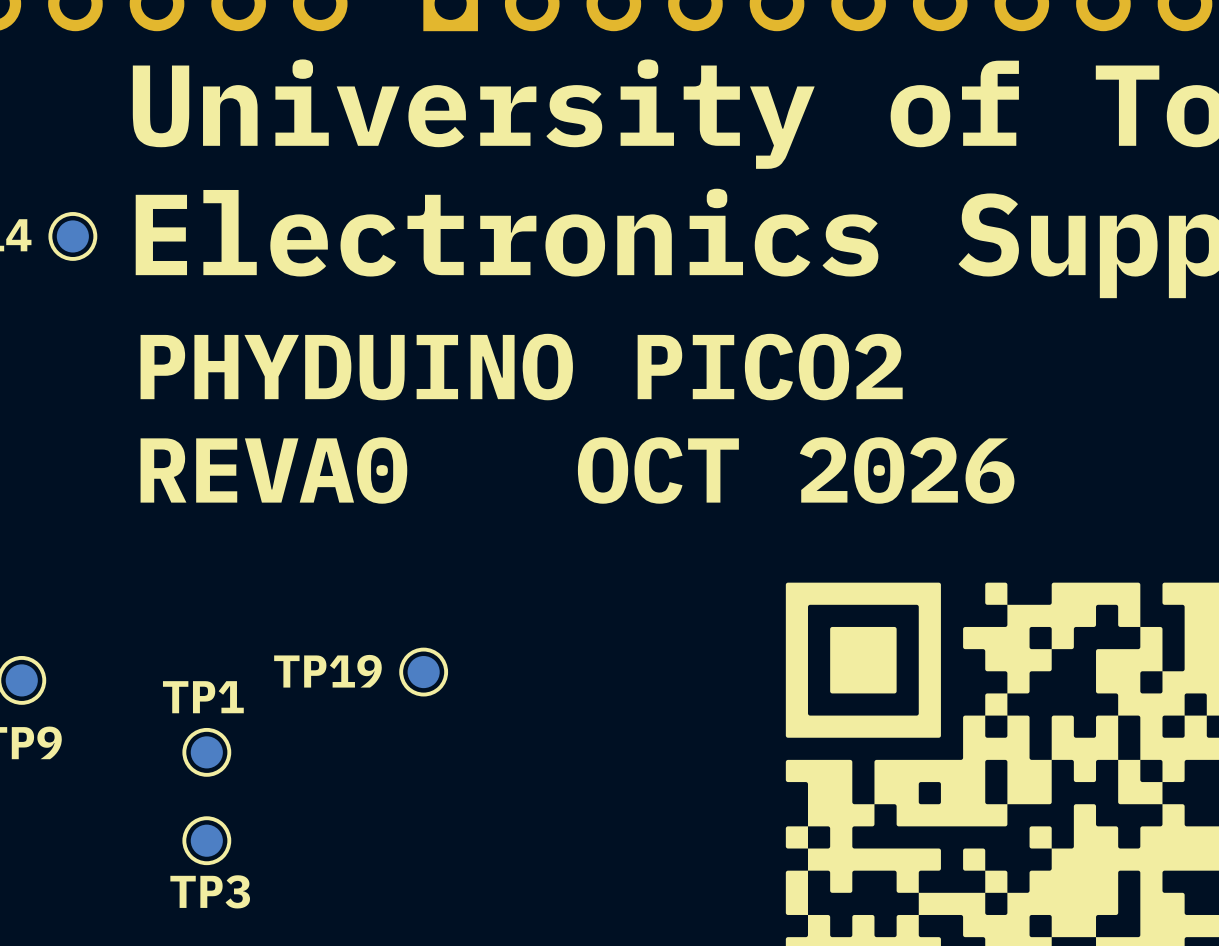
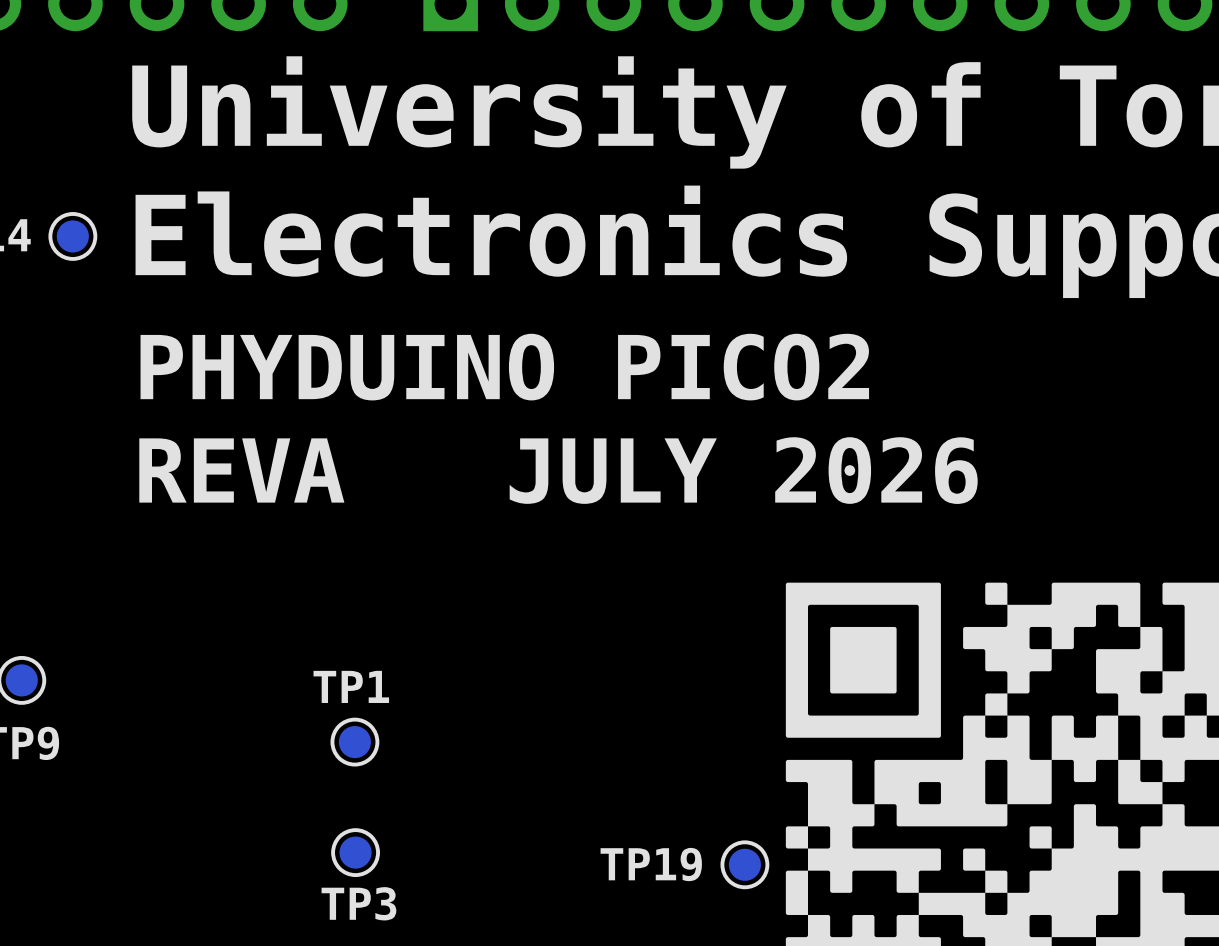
text: REVA0 OCT 2026 (577, 470) -> REVA JULY 2026 (558, 470)
TP19 position: (423, 672) -> (744, 864)
TP1 position: (206, 752) -> (354, 742)
TP3 position: (206, 840) -> (355, 852)

